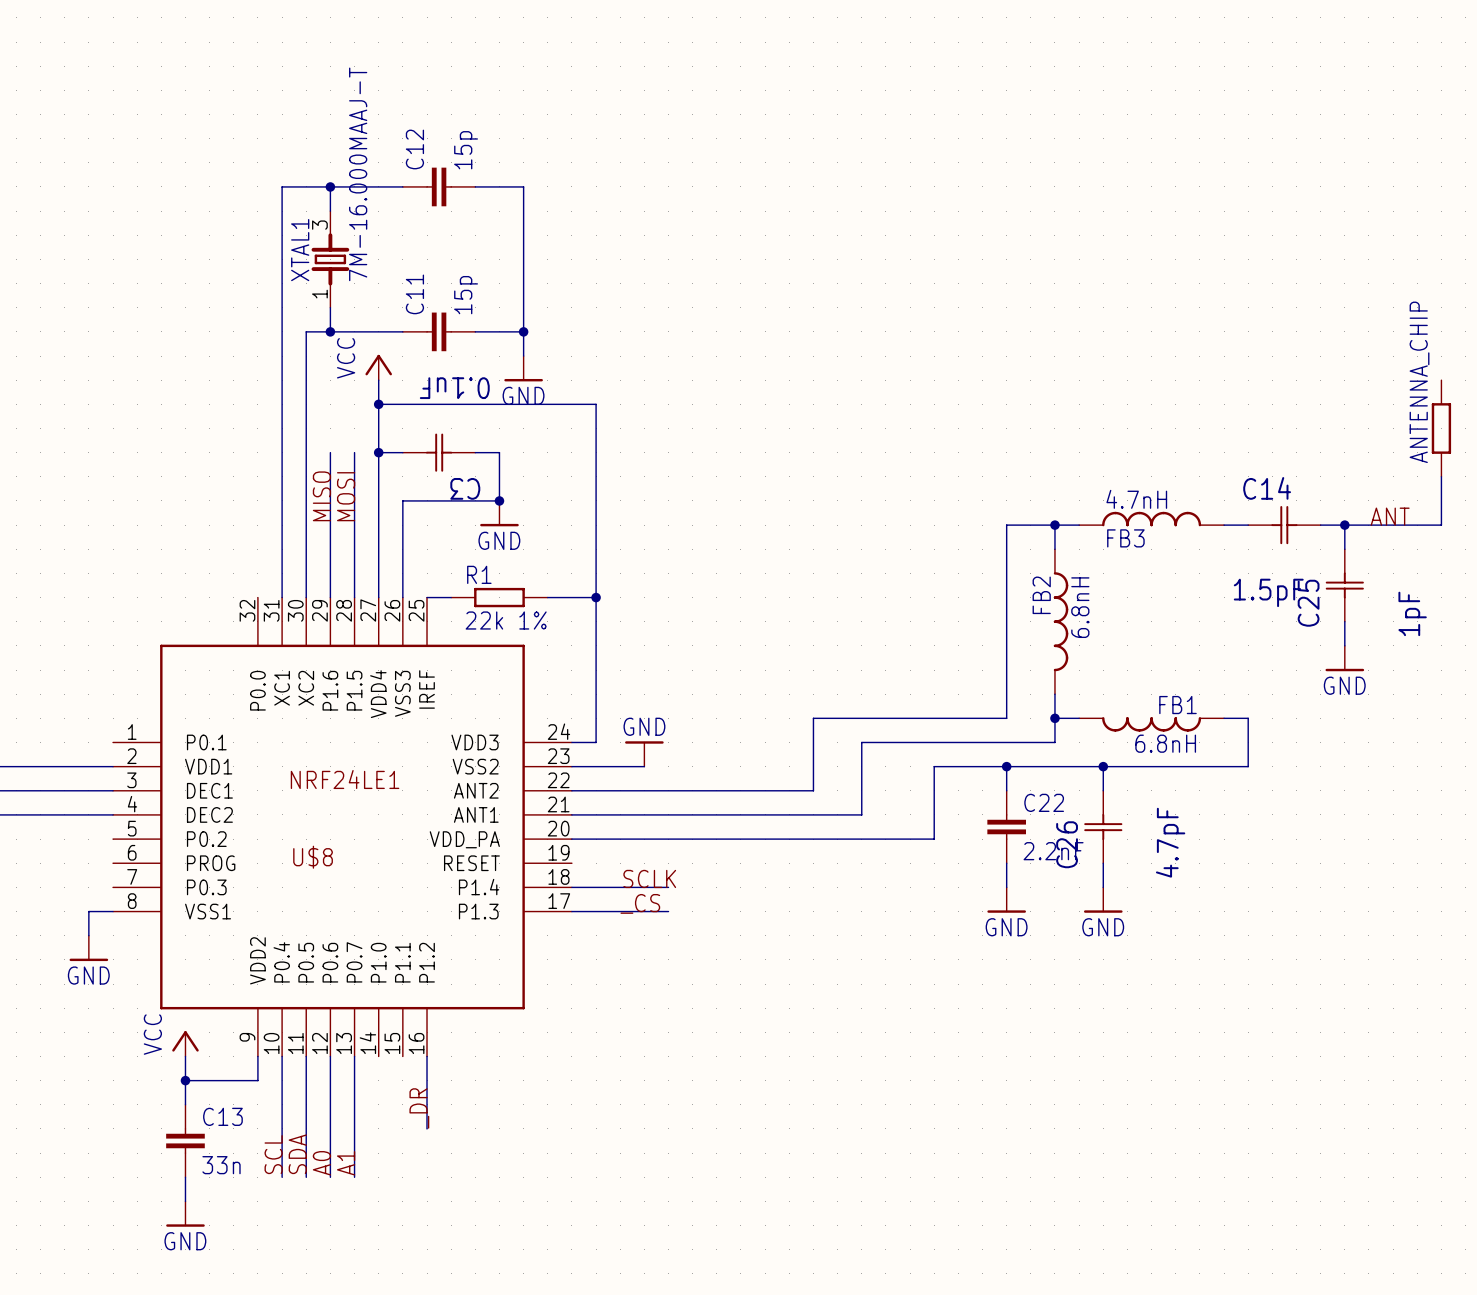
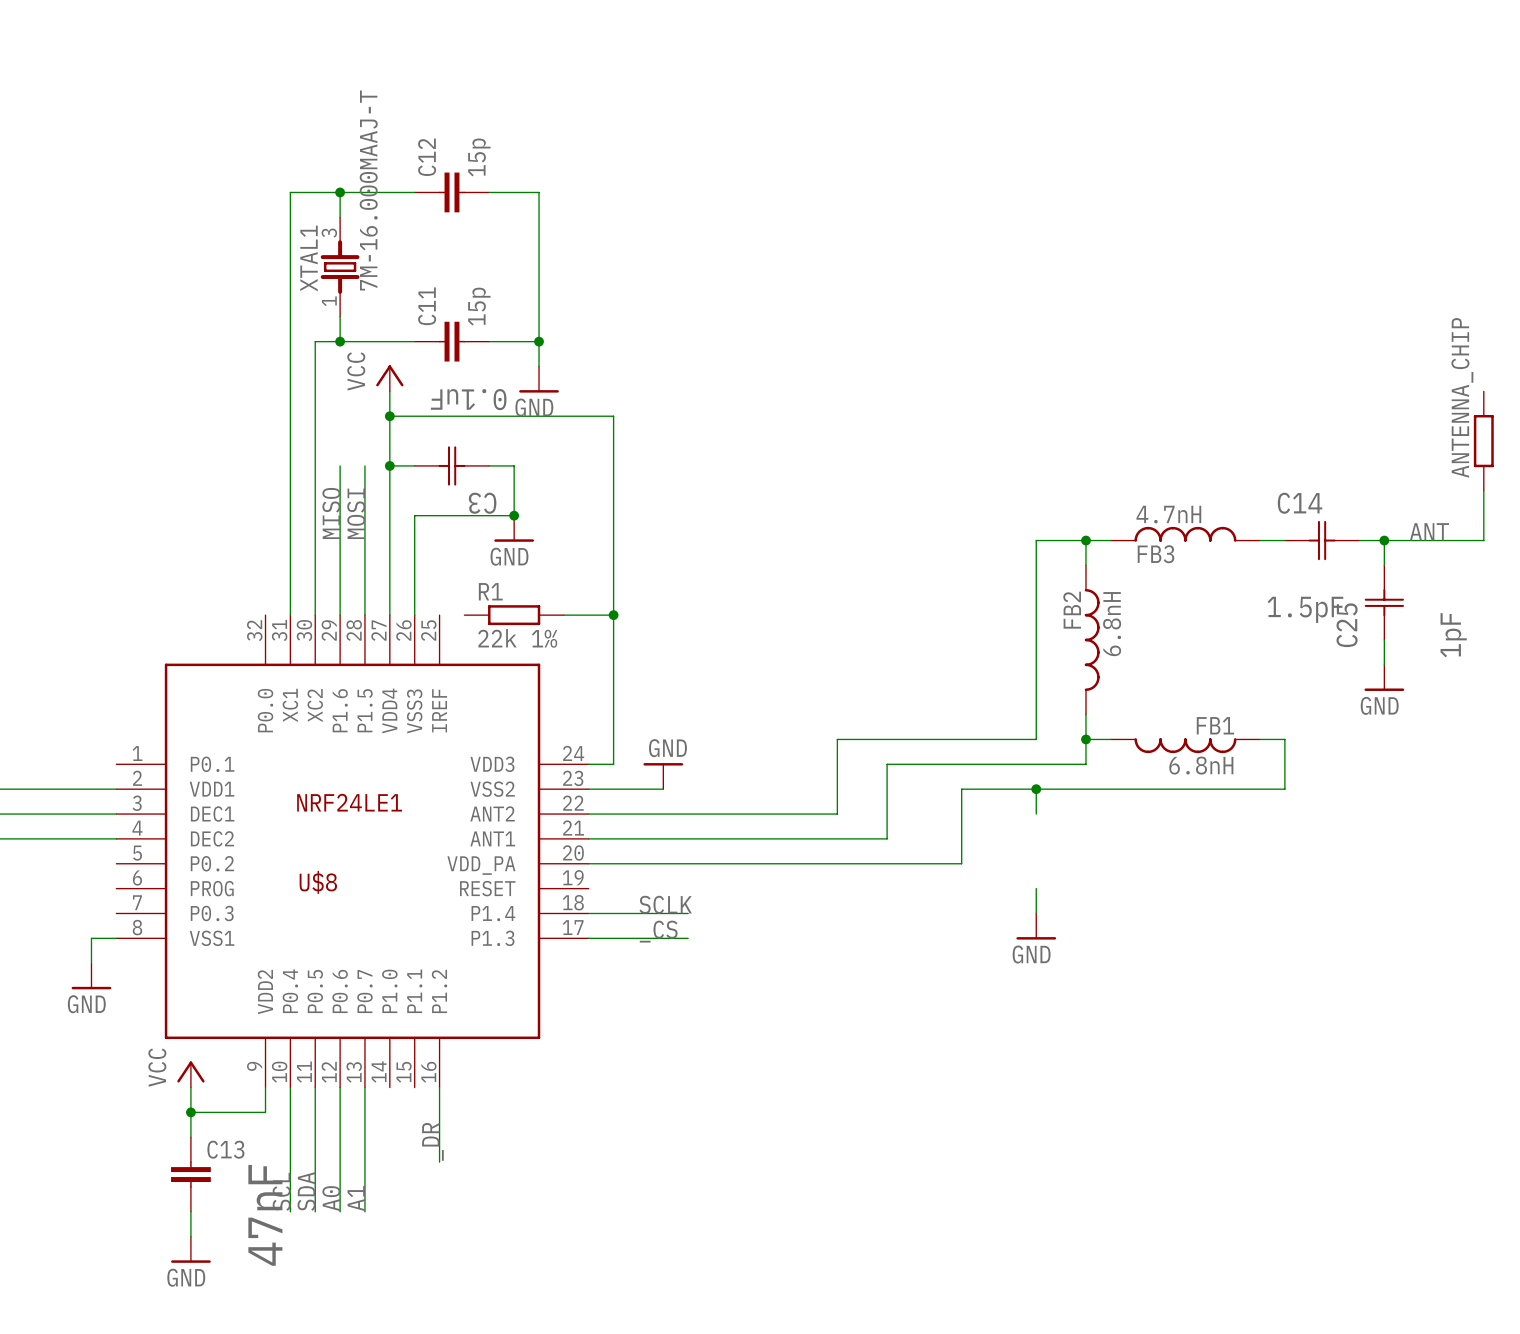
wire: (427, 597) (451, 597) -> none
wire: (1103, 766) (1103, 790) -> none
junction: (1103, 766) -> none
C22: 2.2nF (1006, 827) -> none
C26: 4.7pF (1103, 827) -> none
wire: (1103, 863) (1103, 887) -> none
power symbol: GND (1103, 900) -> none
C13 value: 33n (221, 1165) -> 47nF (265, 1215)

